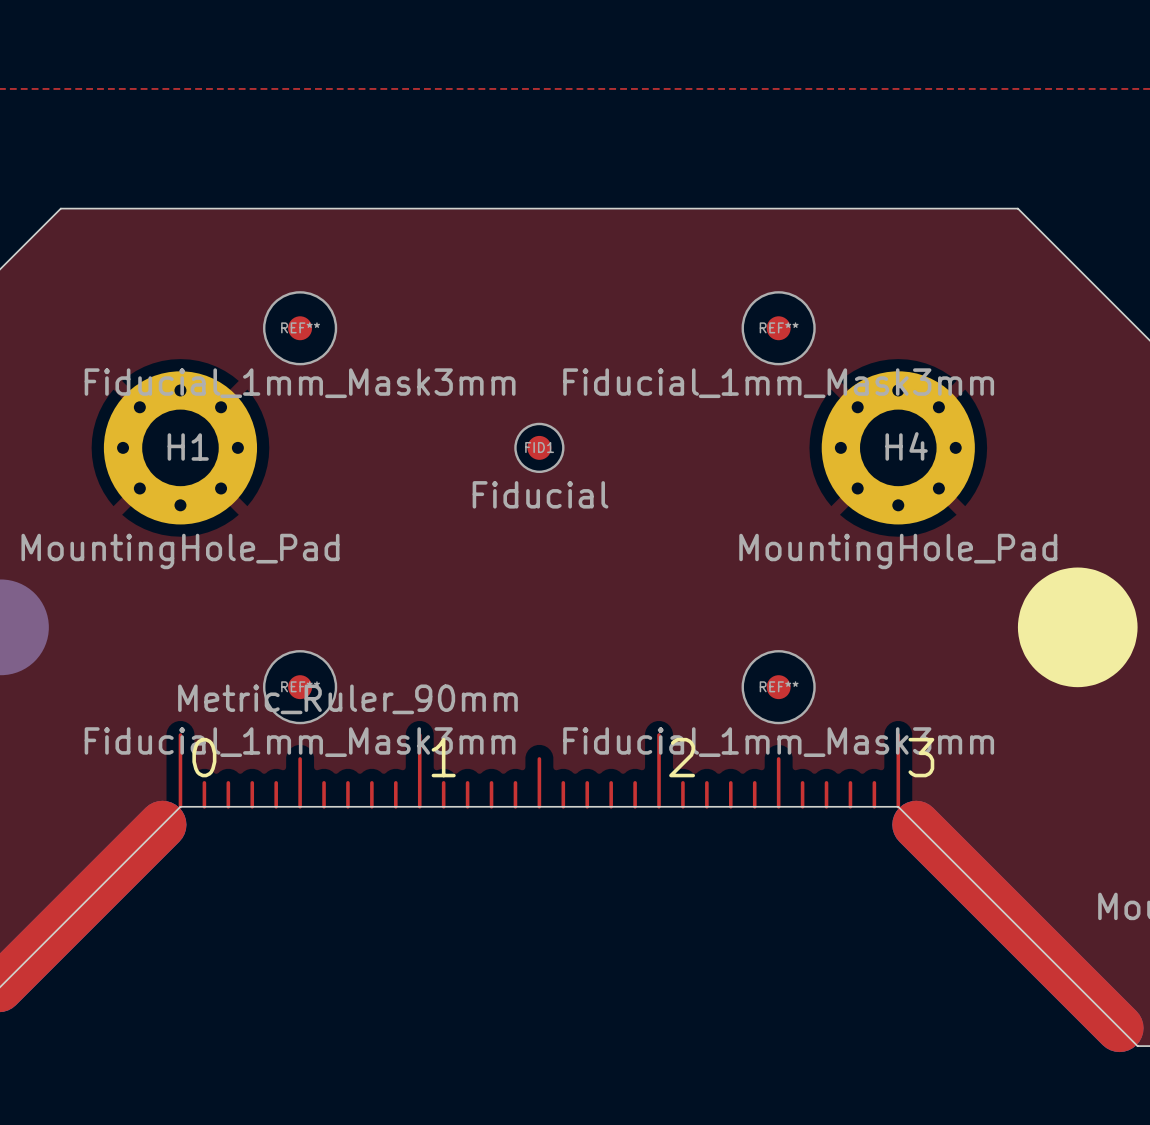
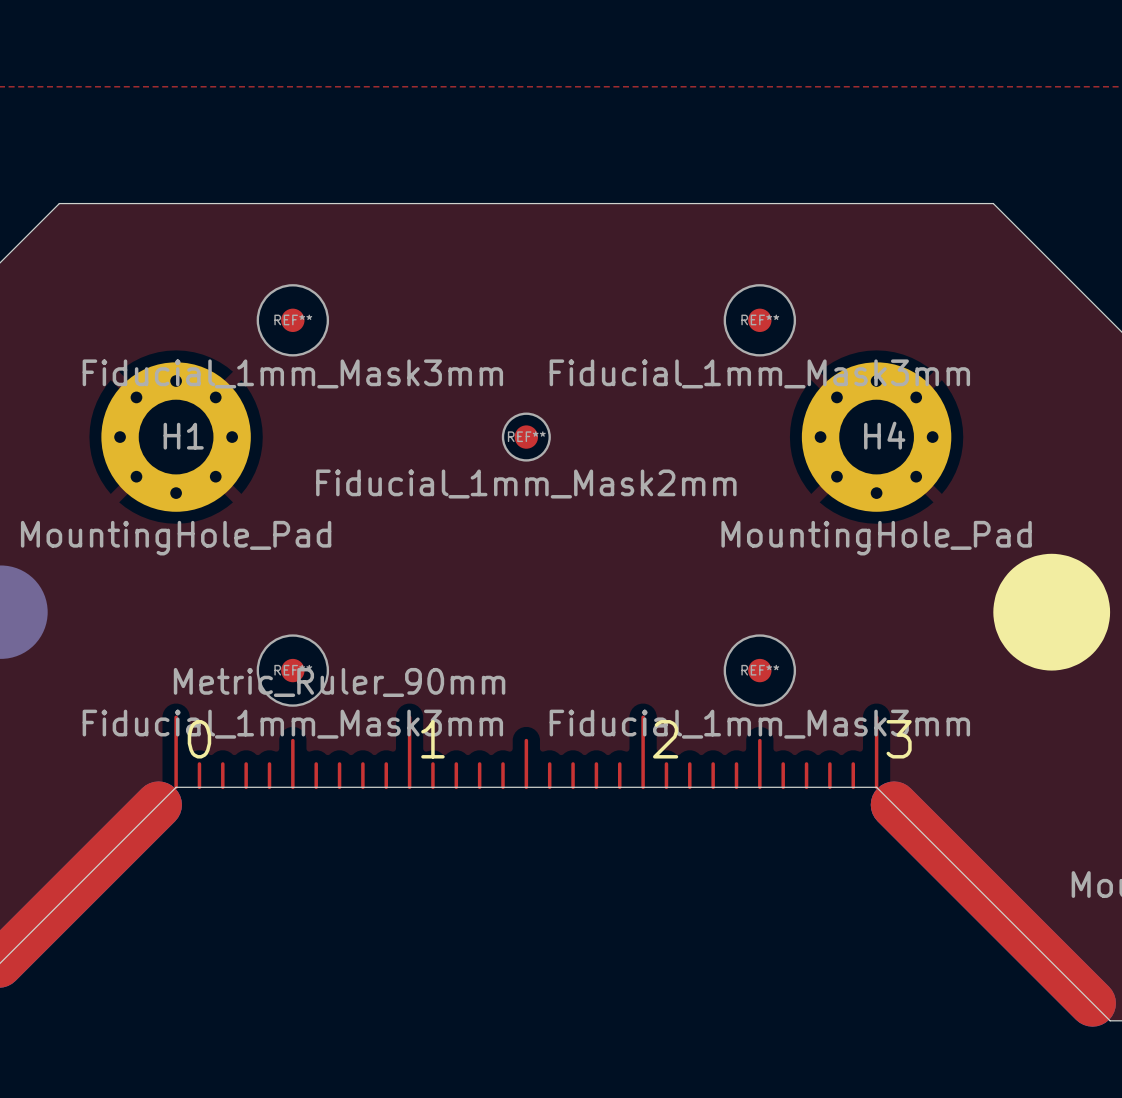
FID1 name: FID1 (539, 447) -> REF** (526, 436)
FID1 value: Fiducial (540, 494) -> Fiducial_1mm_Mask2mm (526, 484)

